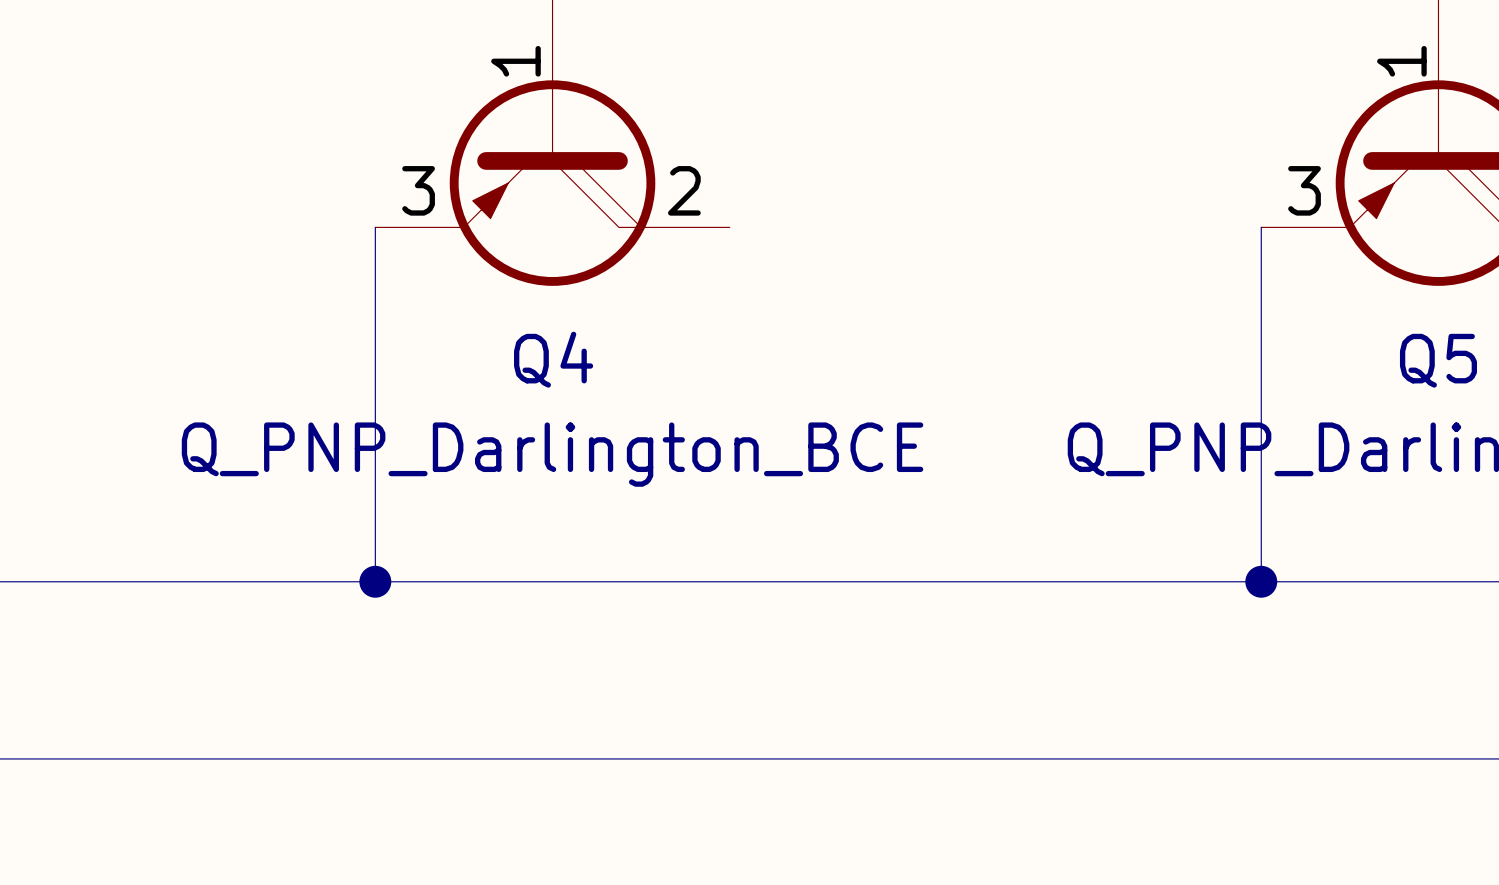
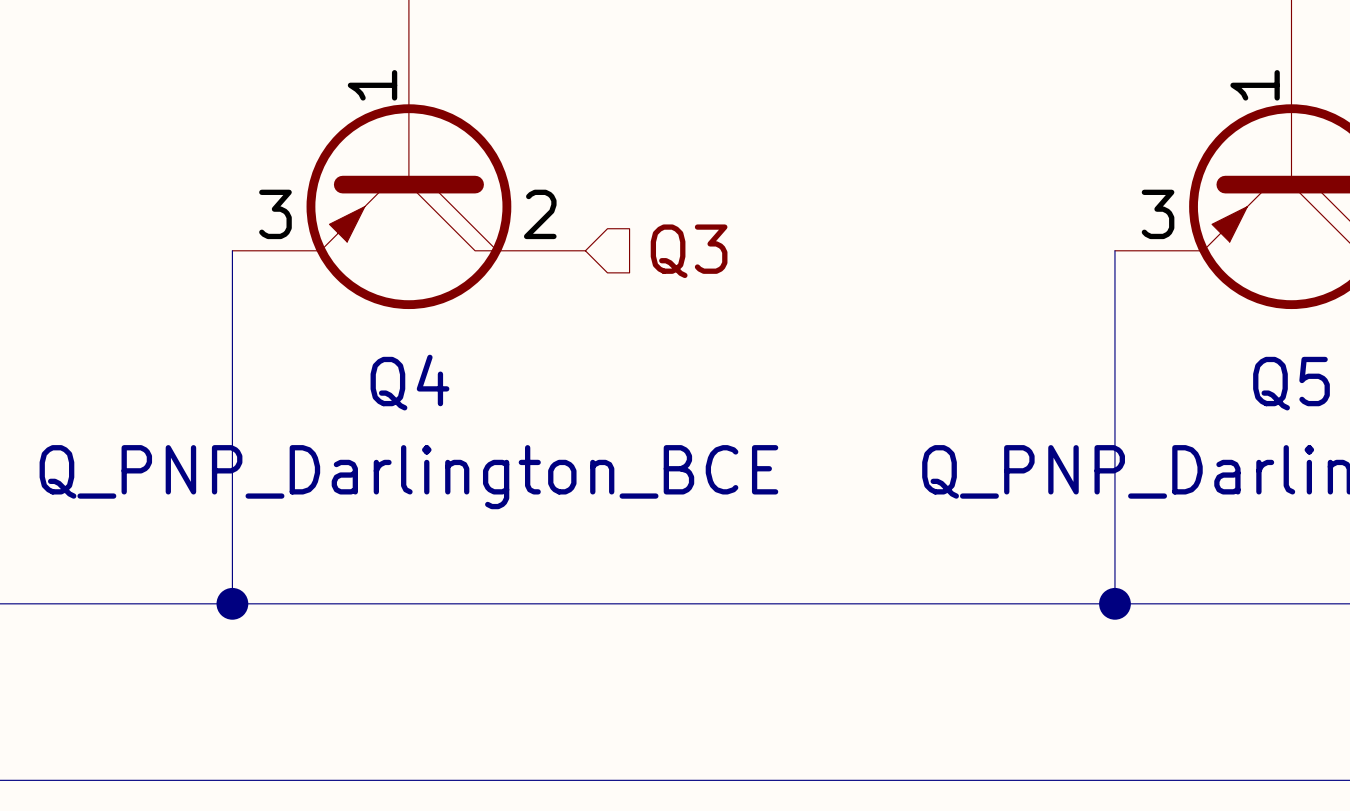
hierarchical label: none -> Q3 (689, 251)

